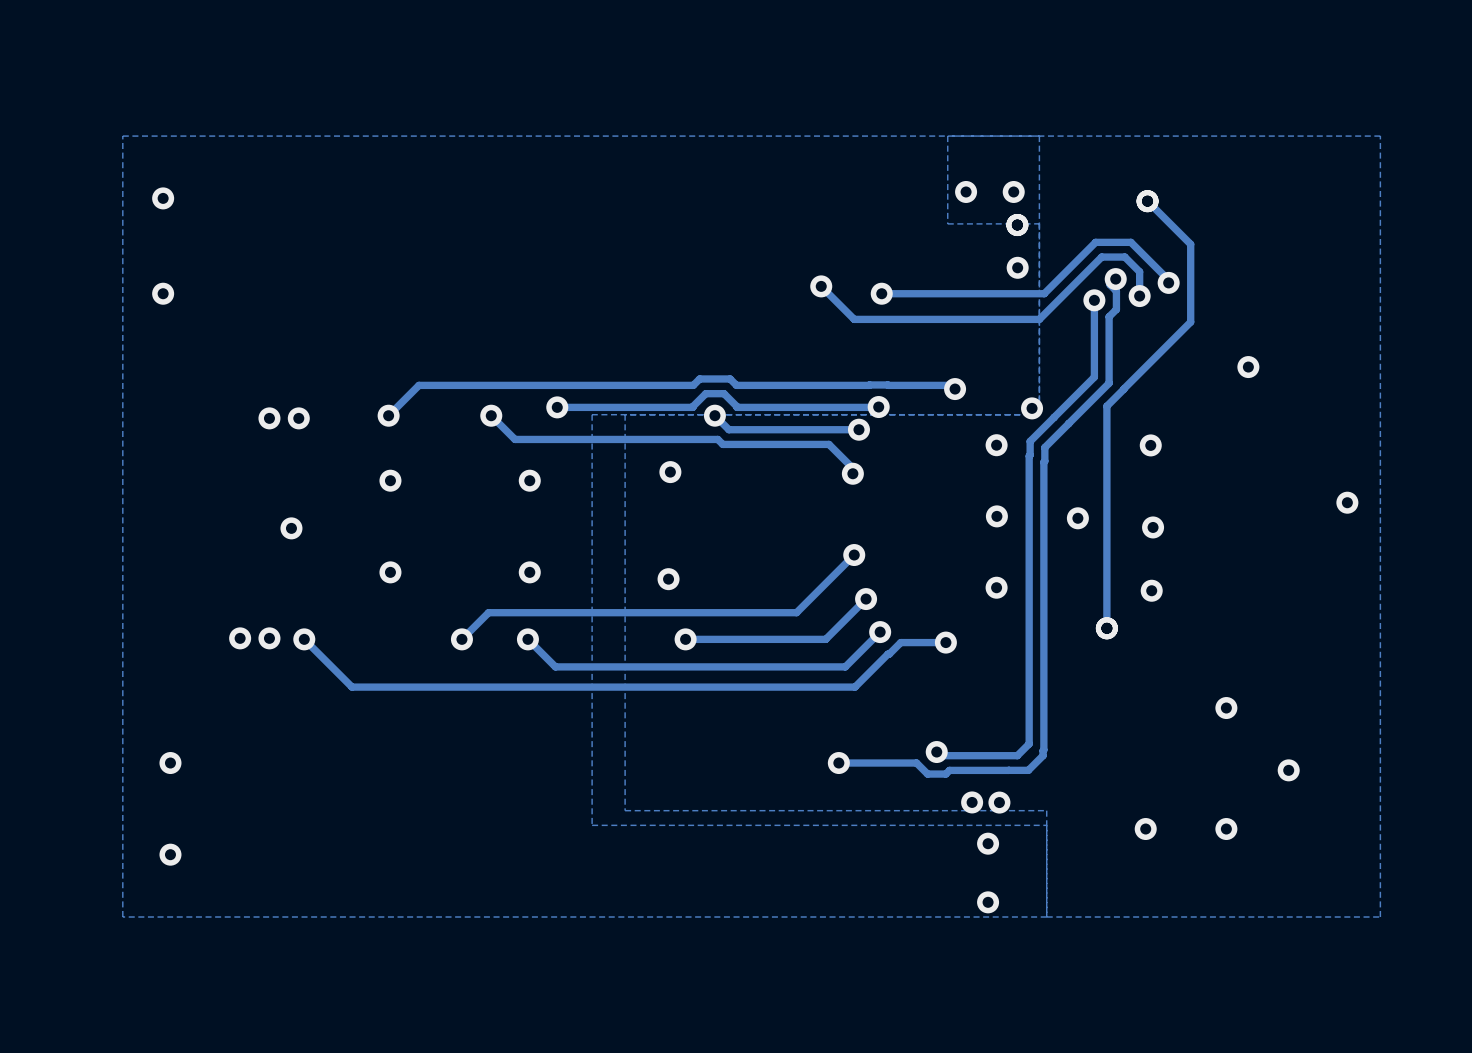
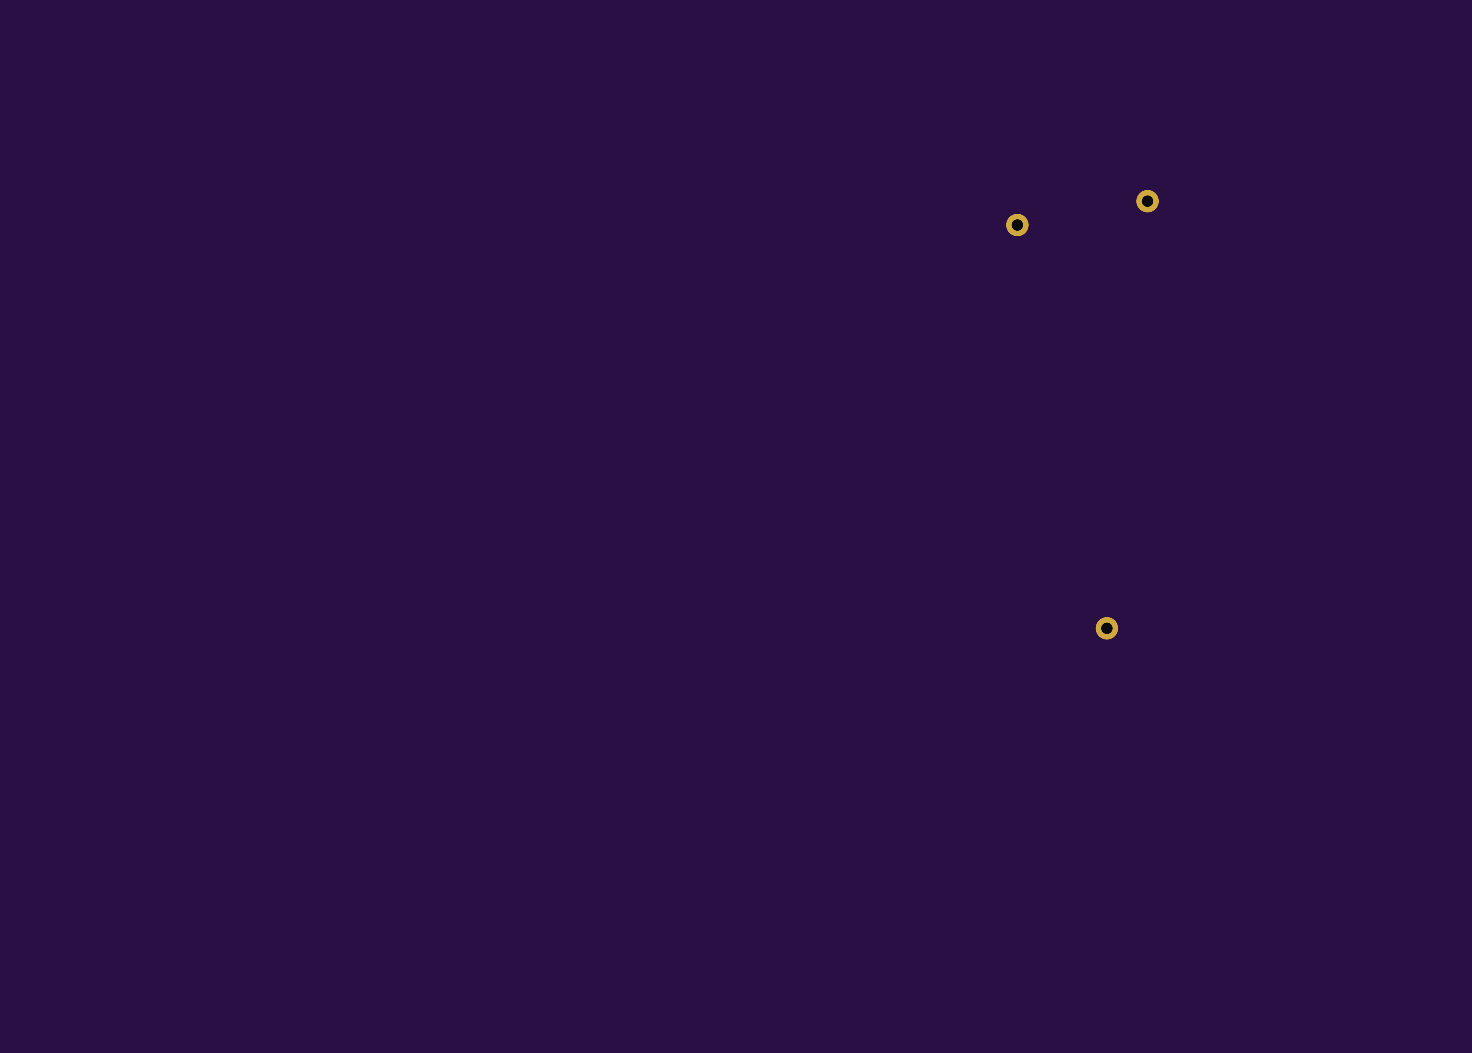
zone outline: (947, 136) (947, 223) (1039, 223) -> none
zone outline: (1039, 136) (1039, 414) (592, 414) (592, 825) (1046, 825) -> none
zone outline: (1380, 136) (1380, 917) (122, 917) (122, 136) (1380, 136) -> none
via: (966, 191) -> none
via: (1013, 191) -> none
via: (163, 198) -> none
track: (1147, 201) (1190, 244) (1190, 322) (1123, 388) -> none
via: (1017, 267) -> none
track: (1115, 279) (1110, 284) (1116, 291) (1116, 309) (1109, 316) (1109, 383) (1044, 447) (1043, 755) (1028, 770) (949, 770) (945, 774) (927, 774) (916, 763) (838, 763) -> none
via: (1115, 279) -> none
track: (1168, 280) (1130, 242) (1095, 242) (1044, 293) (881, 293) -> none
via: (1168, 282) -> none
track: (821, 286) (854, 319) (1039, 319) (1101, 257) (1124, 257) (1139, 271) (1139, 296) -> none
via: (821, 286) -> none
via: (163, 293) -> none
via: (881, 293) -> none
via: (1139, 296) -> none
track: (1094, 300) (1094, 377) (1030, 441) (1029, 743) (1017, 755) (940, 755) (936, 752) -> none
via: (1094, 300) -> none
via: (1248, 367) -> none
track: (887, 384) (869, 384) -> none
track: (869, 385) (736, 385) (730, 378) (699, 378) (693, 385) (418, 385) (388, 415) -> none
track: (888, 385) (947, 385) (951, 389) (955, 389) -> none
via: (955, 389) -> none
track: (1123, 389) (1106, 406) (1106, 628) -> none
via: (557, 407) -> none
track: (878, 407) (736, 407) (724, 393) (705, 393) (692, 407) (557, 407) -> none
via: (878, 407) -> none
via: (1032, 408) -> none
zone outline: (625, 414) (625, 810) (1046, 810) (1046, 917) -> none
via: (388, 415) -> none
track: (491, 415) (515, 439) (717, 439) (722, 444) (829, 444) (852, 468) (852, 473) -> none
via: (491, 415) -> none
track: (714, 415) (728, 429) (858, 429) -> none
via: (714, 415) -> none
via: (269, 418) -> none
via: (298, 418) -> none
via: (858, 429) -> none
via: (996, 445) -> none
via: (1150, 445) -> none
via: (670, 472) -> none
via: (852, 473) -> none
via: (390, 480) -> none
via: (529, 480) -> none
via: (1347, 502) -> none
via: (996, 516) -> none
via: (1077, 518) -> none
via: (1153, 527) -> none
via: (291, 528) -> none
track: (854, 555) (857, 557) (851, 557) (796, 612) (488, 612) (461, 639) -> none
via: (854, 555) -> none
via: (390, 572) -> none
via: (529, 572) -> none
via: (668, 579) -> none
via: (996, 587) -> none
via: (1151, 590) -> none
track: (866, 599) (825, 639) (685, 639) -> none
via: (866, 599) -> none
track: (880, 632) (845, 666) (555, 666) (527, 639) -> none
via: (880, 632) -> none
via: (240, 638) -> none
via: (269, 638) -> none
track: (304, 639) (352, 687) (855, 687) (900, 642) (945, 642) -> none
via: (304, 639) -> none
via: (461, 639) -> none
via: (527, 639) -> none
via: (685, 639) -> none
via: (945, 642) -> none
via: (1226, 708) -> none
via: (936, 752) -> none
via: (170, 763) -> none
via: (838, 763) -> none
via: (1288, 770) -> none
via: (972, 802) -> none
via: (999, 802) -> none
via: (1145, 829) -> none
via: (1226, 829) -> none
via: (988, 843) -> none
via: (170, 854) -> none
via: (988, 902) -> none

